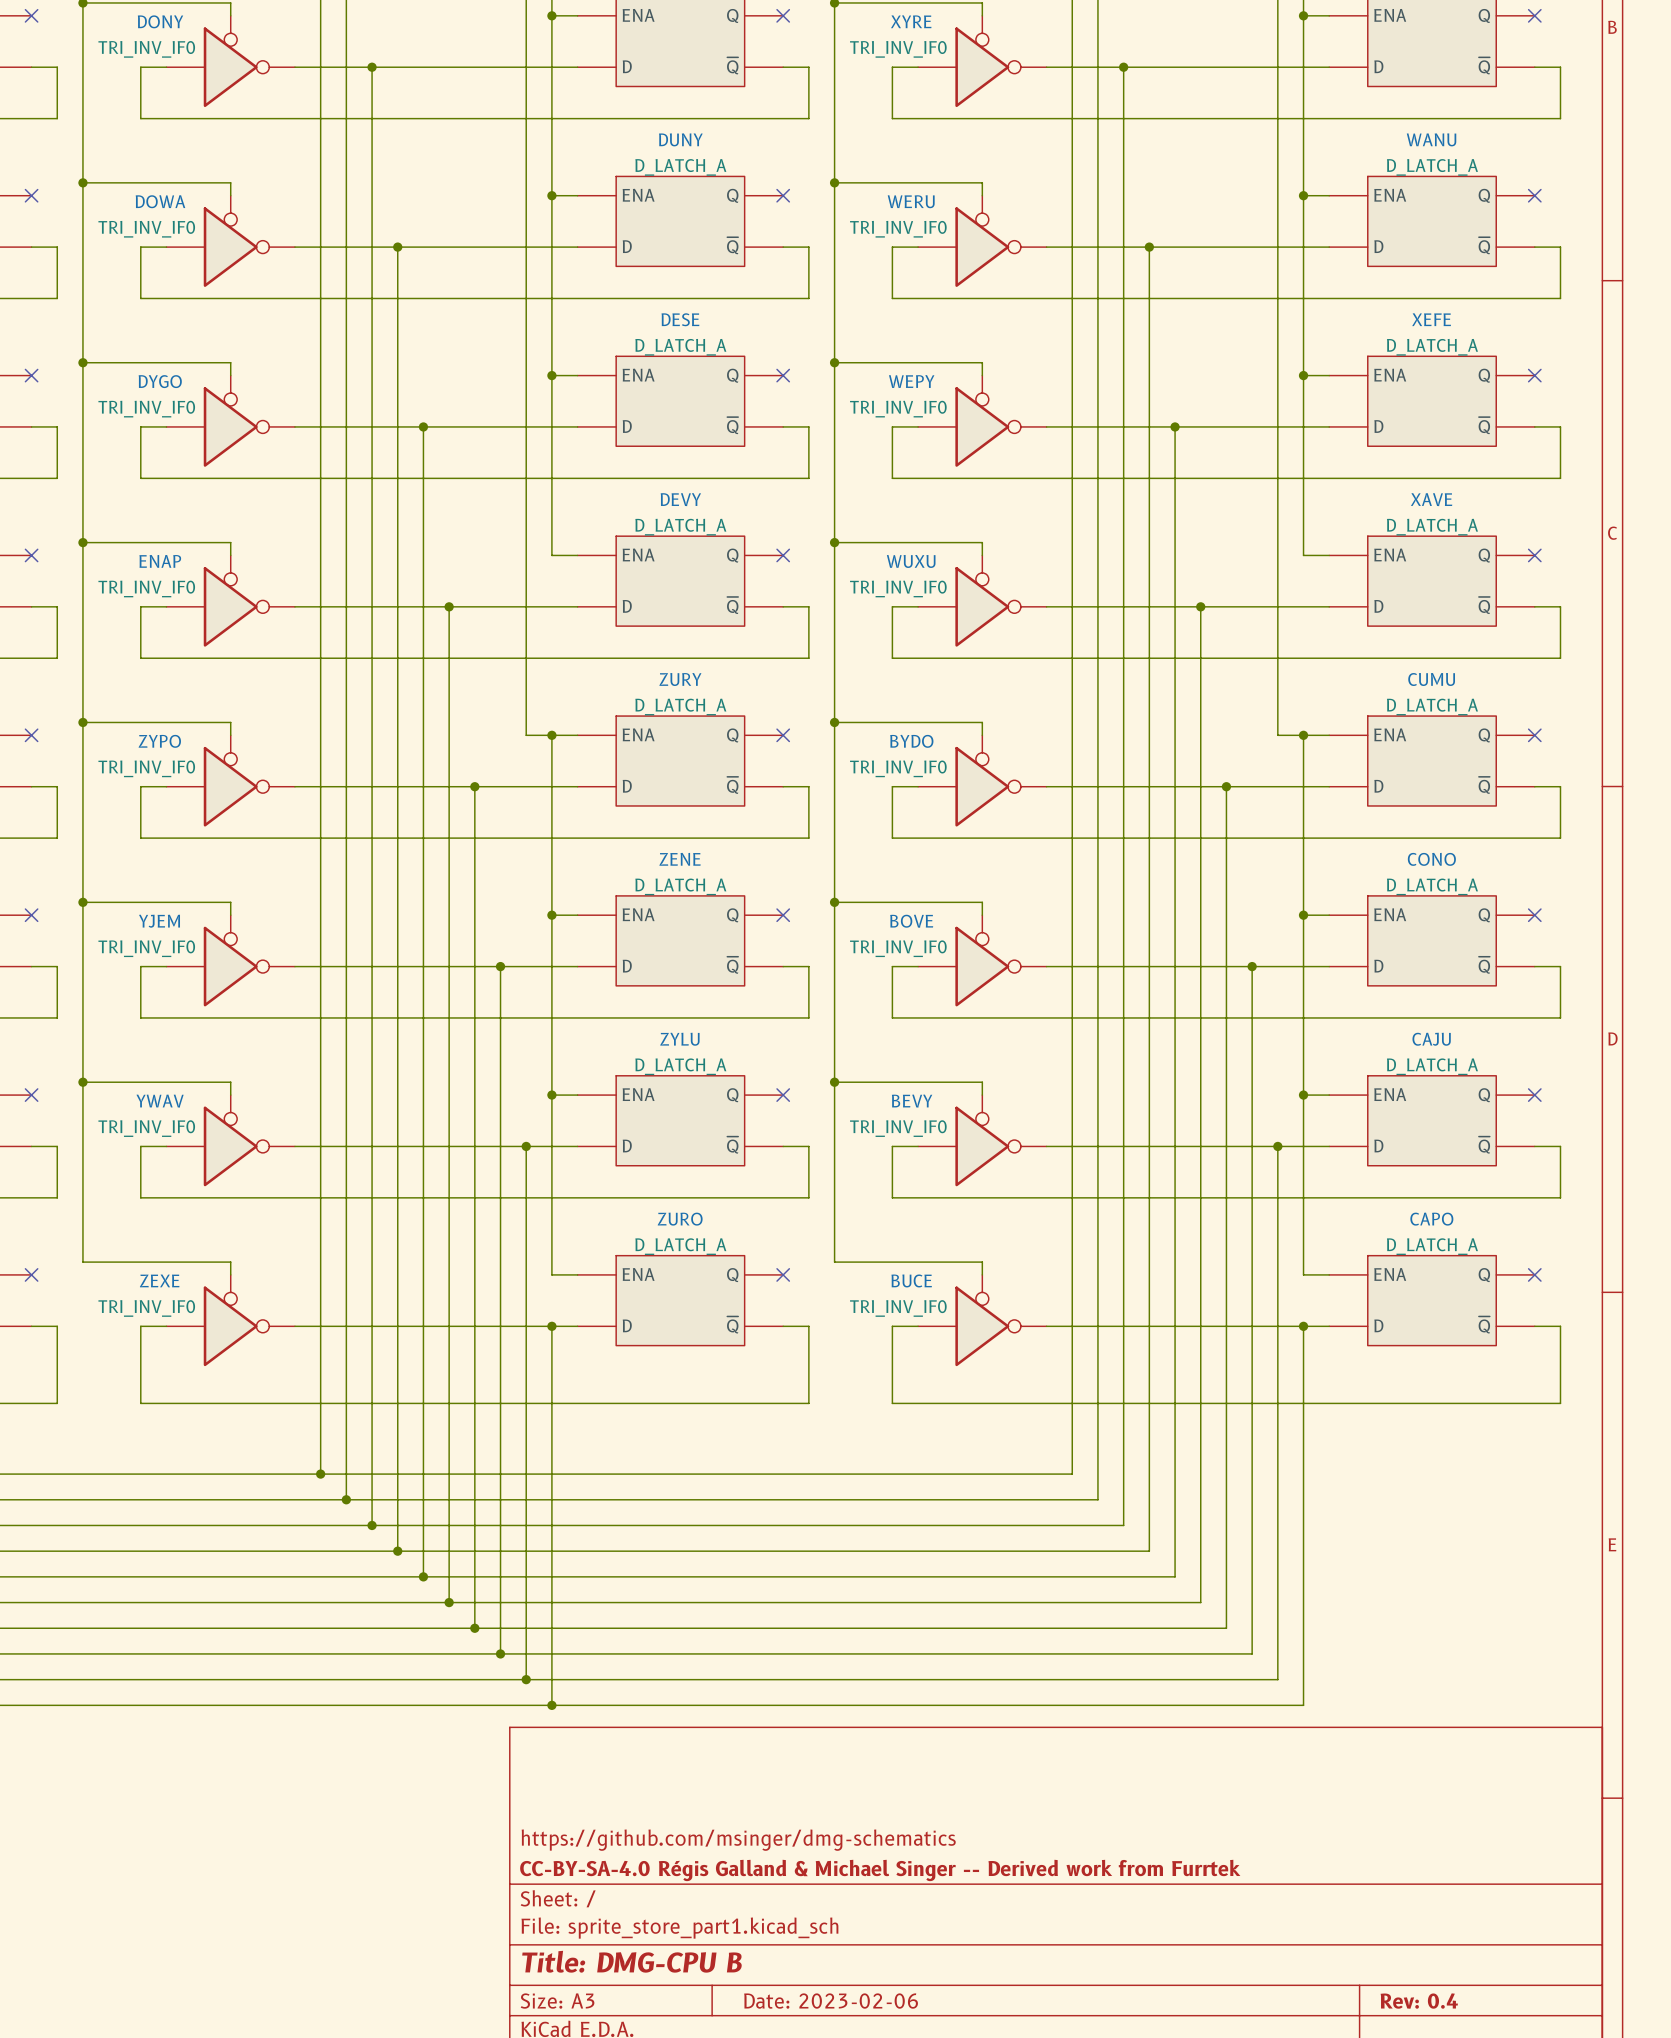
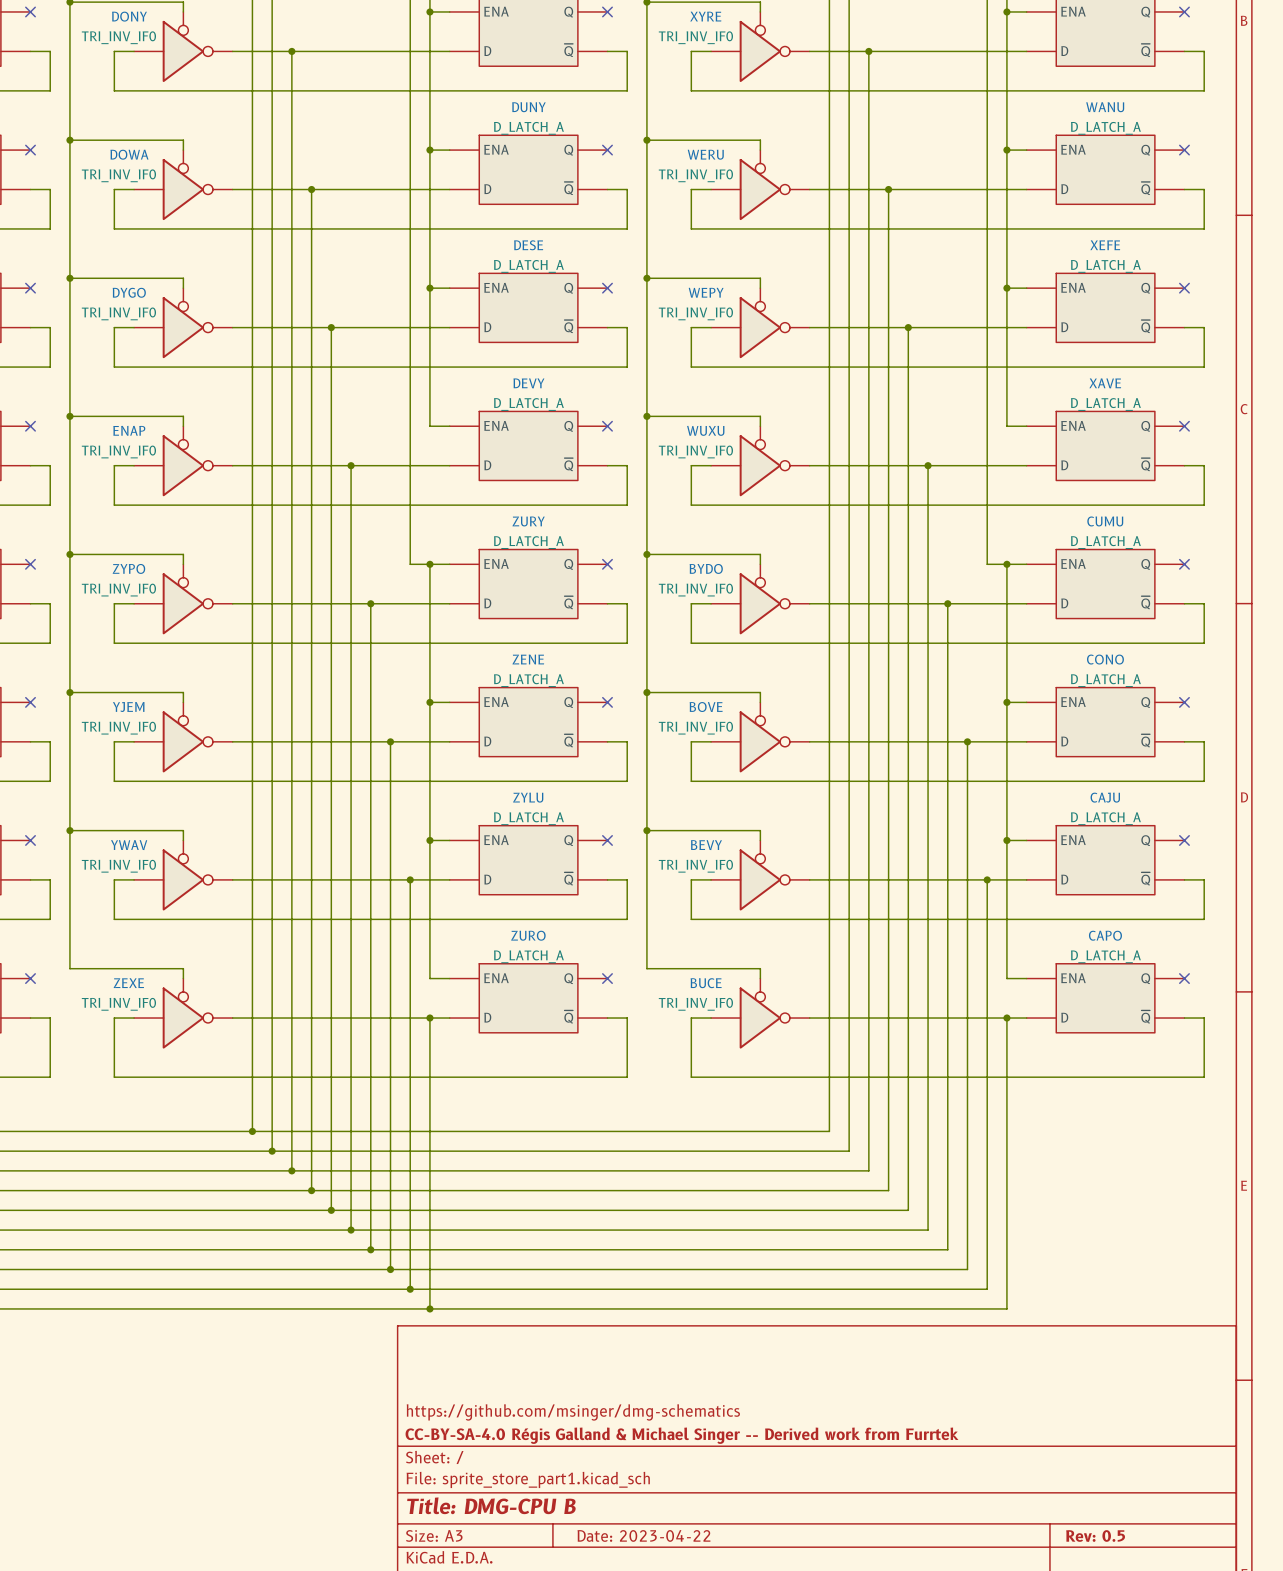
title block: Date: 2023-02-06 (831, 2001) -> Date: 2023-04-22 (643, 1535)
title block: Rev: 0.4 (1419, 2001) -> Rev: 0.5 (1095, 1536)

